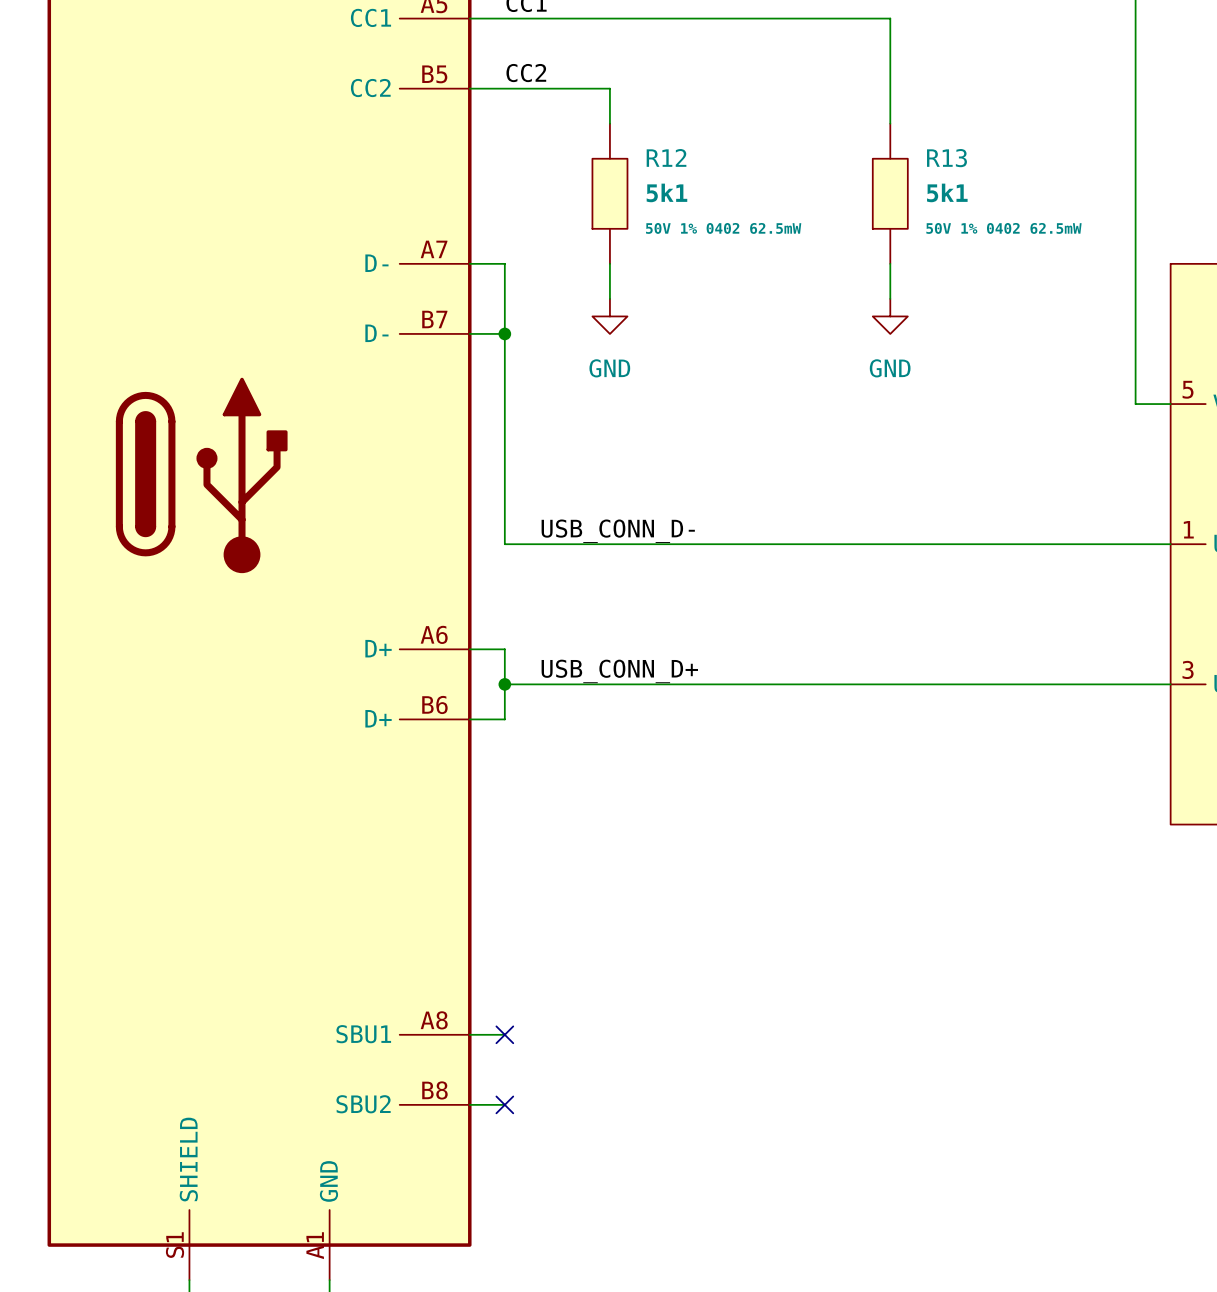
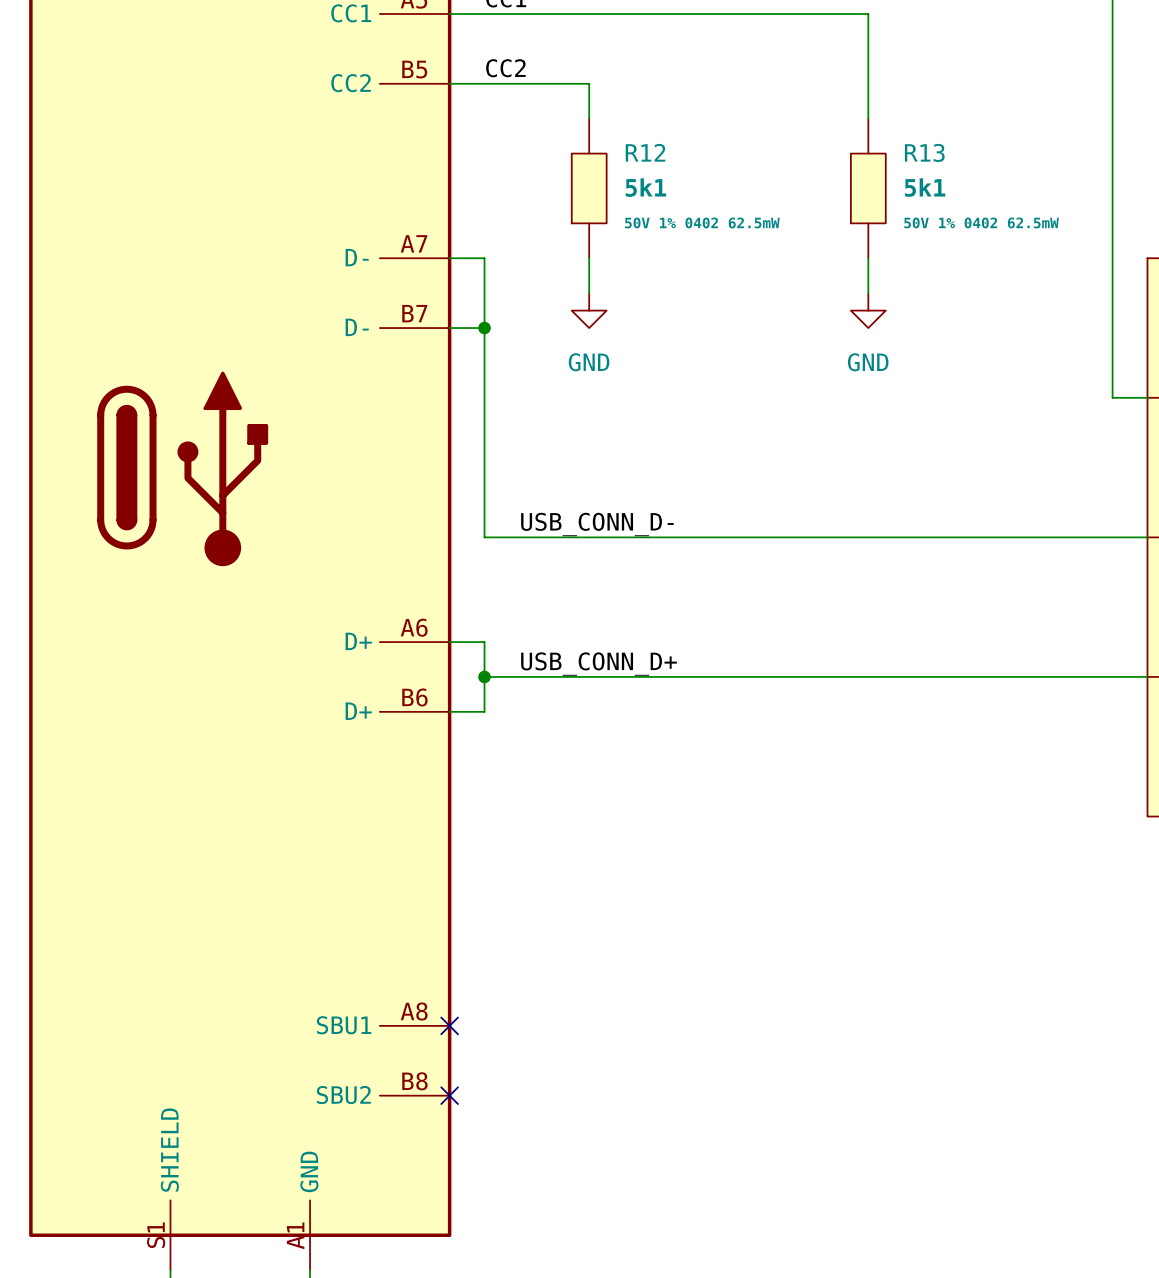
wire: (469, 1034) (504, 1034) -> none
no-connect mark position: (504, 1034) -> (449, 1025)
wire: (469, 1104) (504, 1104) -> none
no-connect mark position: (504, 1104) -> (449, 1095)

